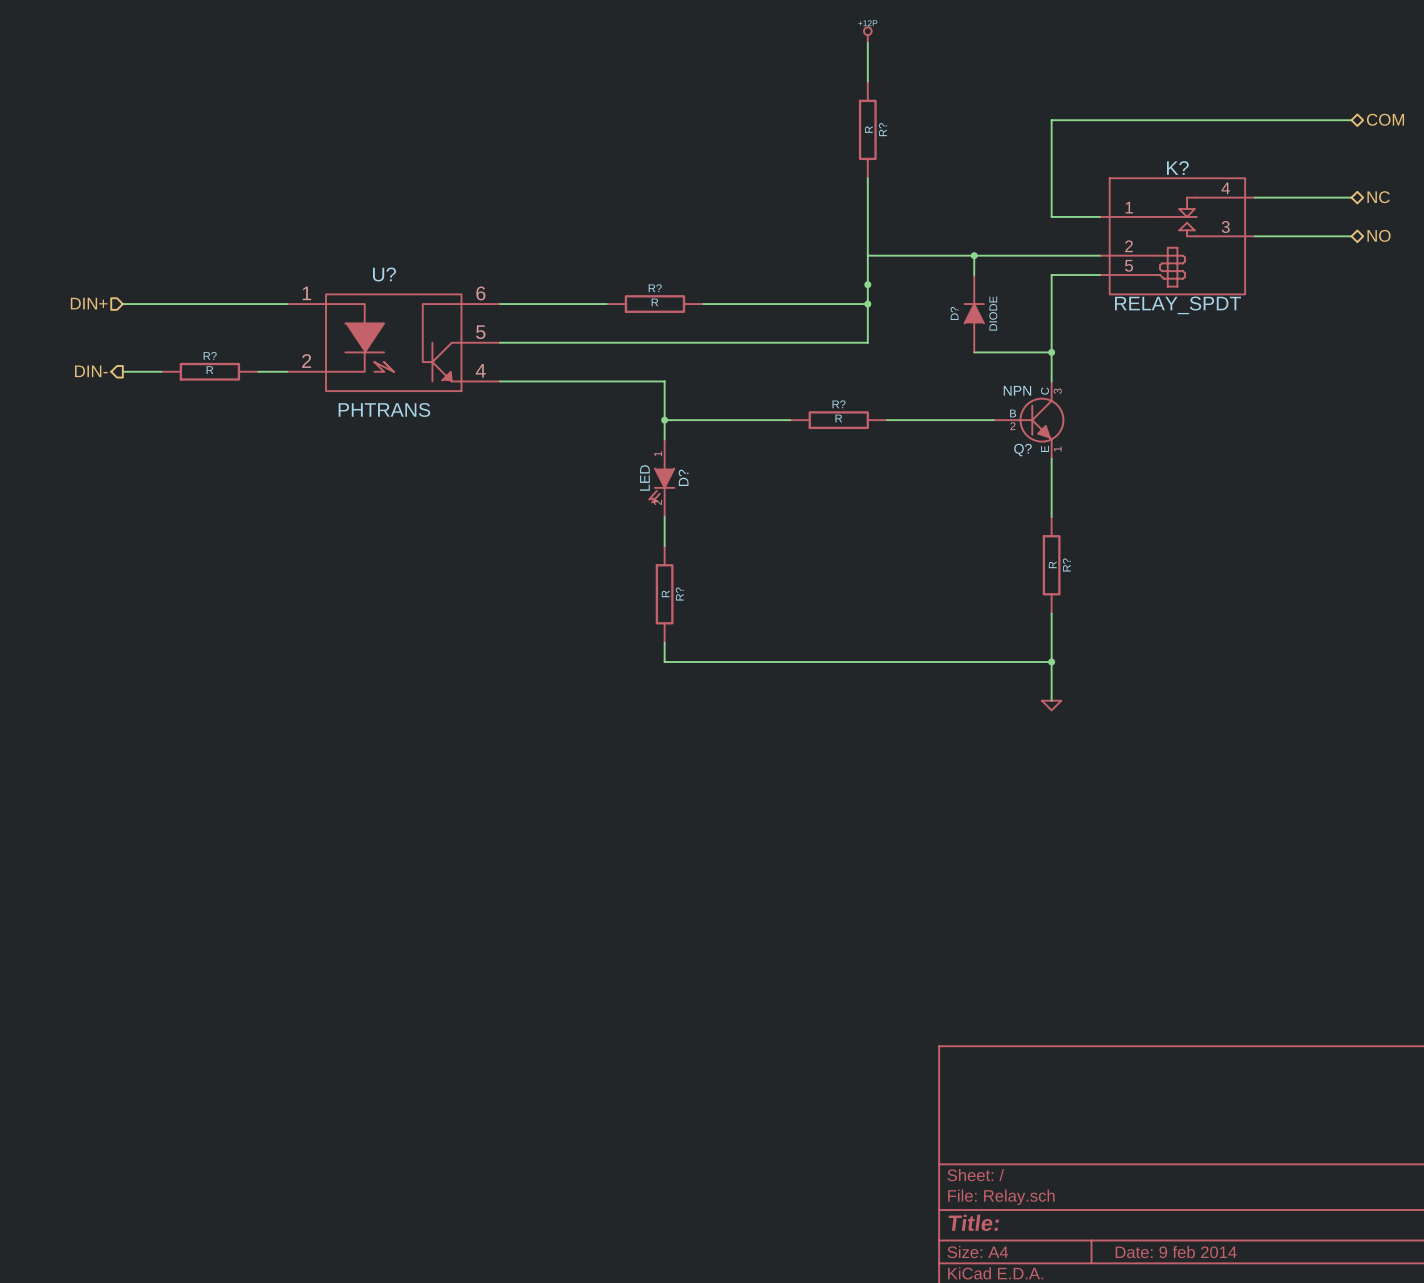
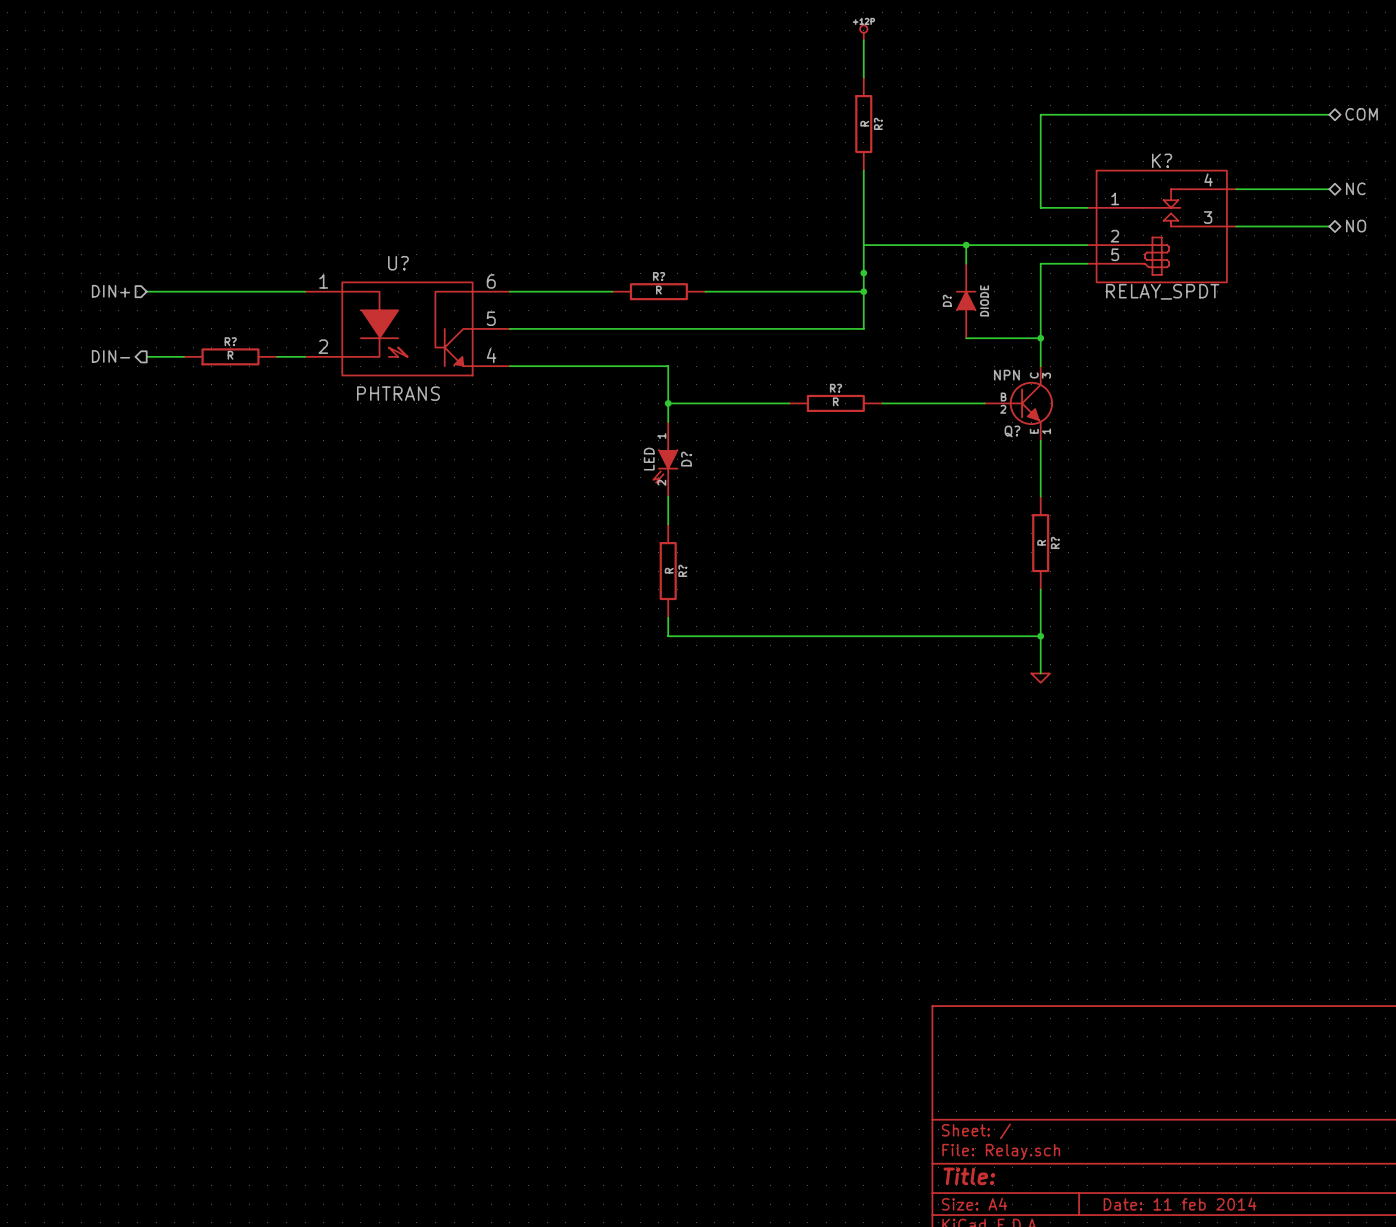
title block: Date: 9 feb 2014 (1176, 1252) -> Date: 11 feb 2014 (1180, 1204)

